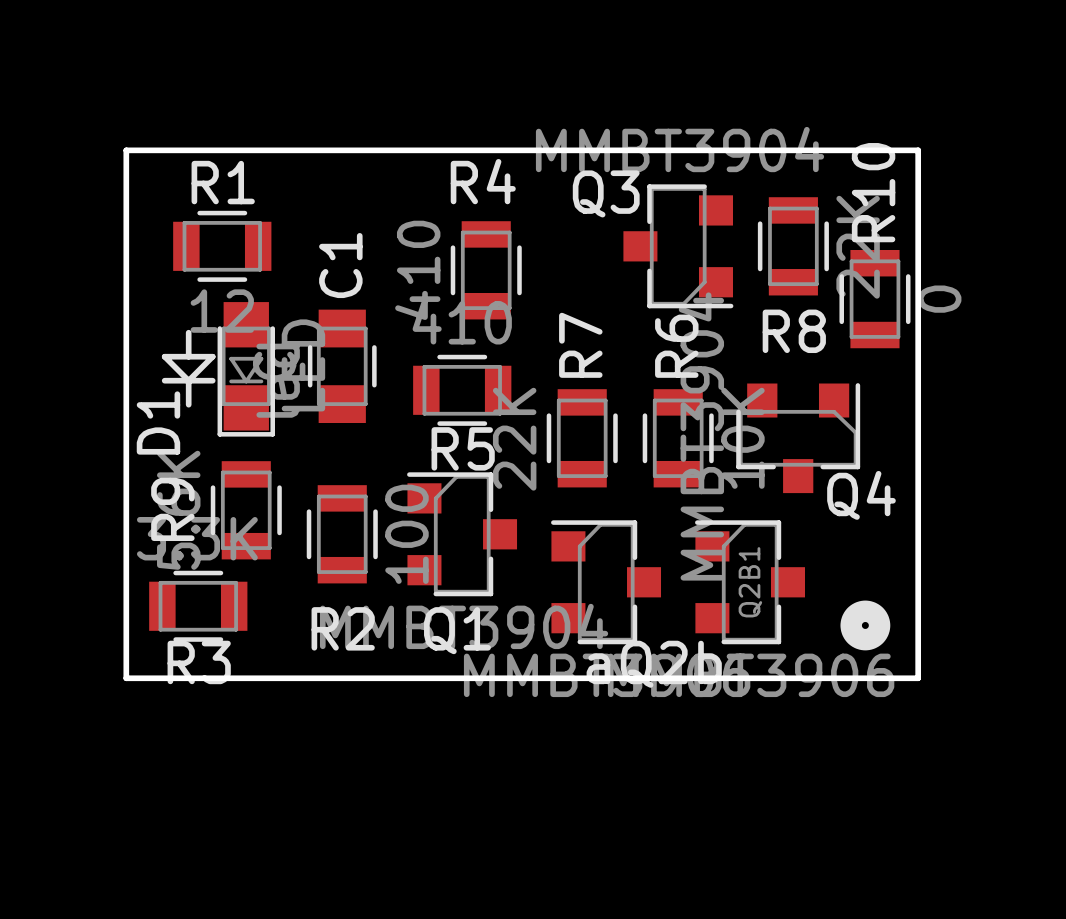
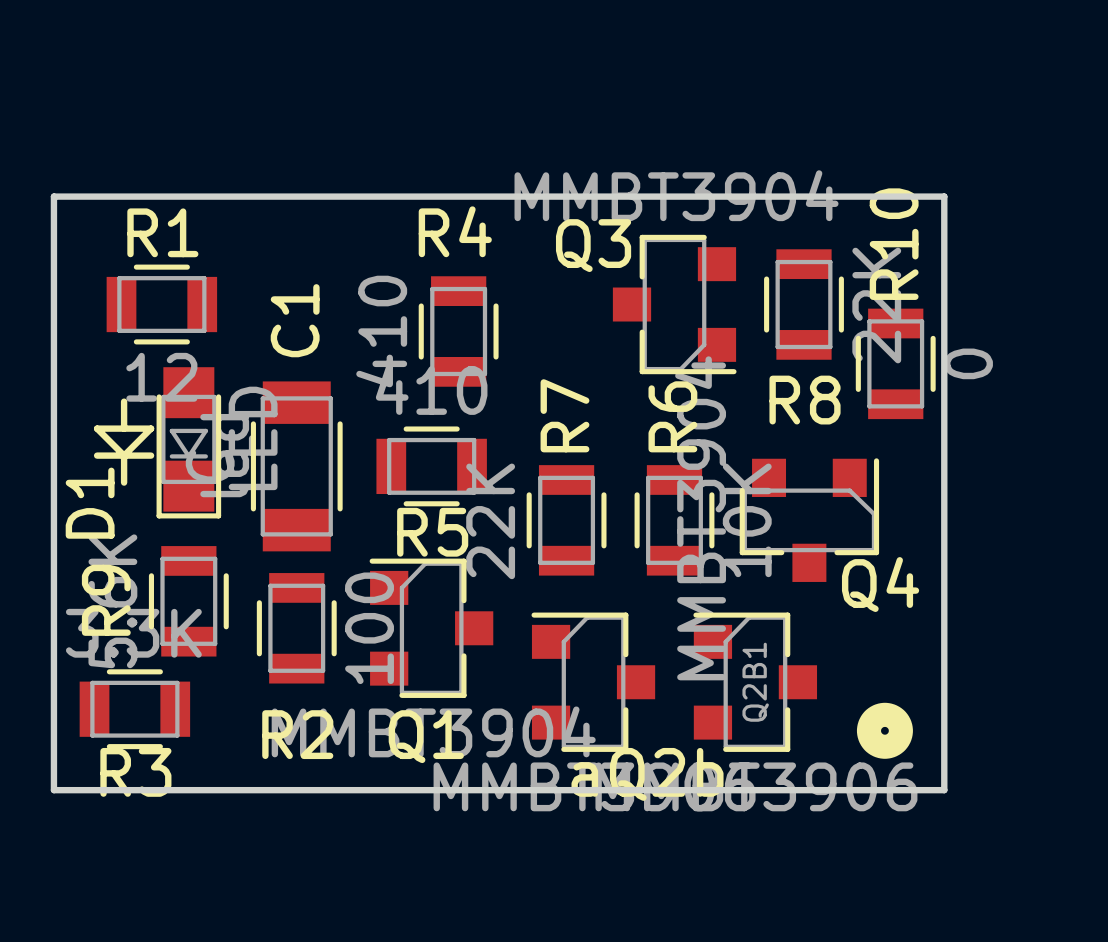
C1 footprint: [307, 309, 377, 423] -> [250, 381, 343, 552]

